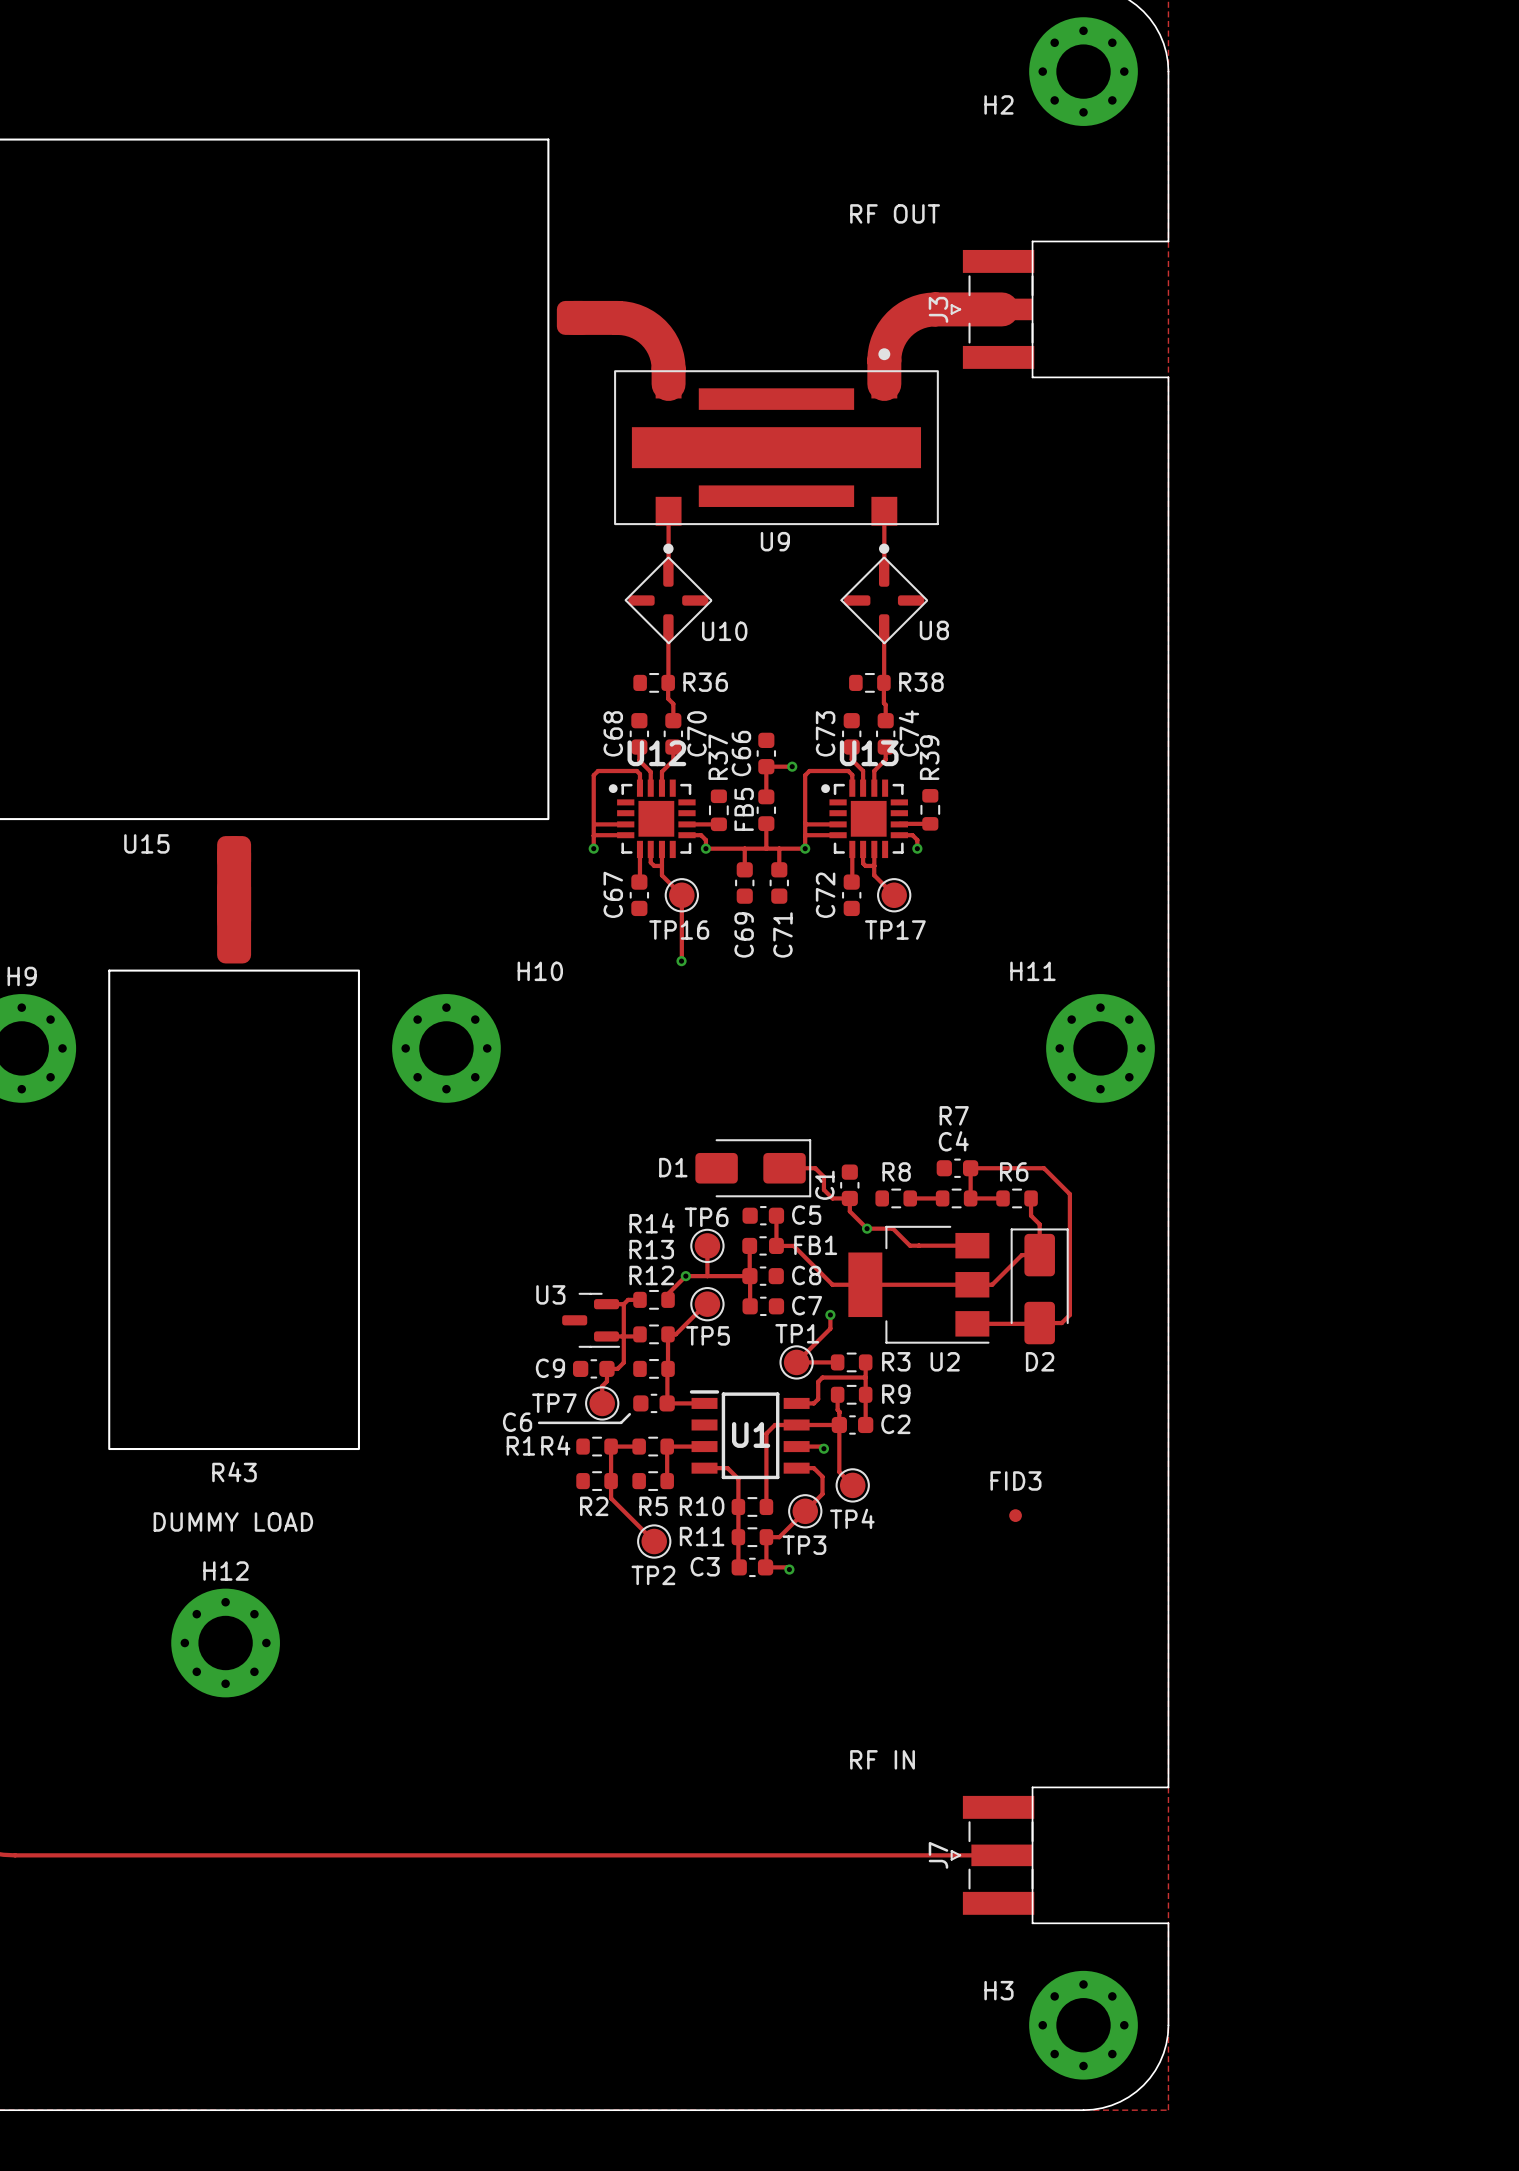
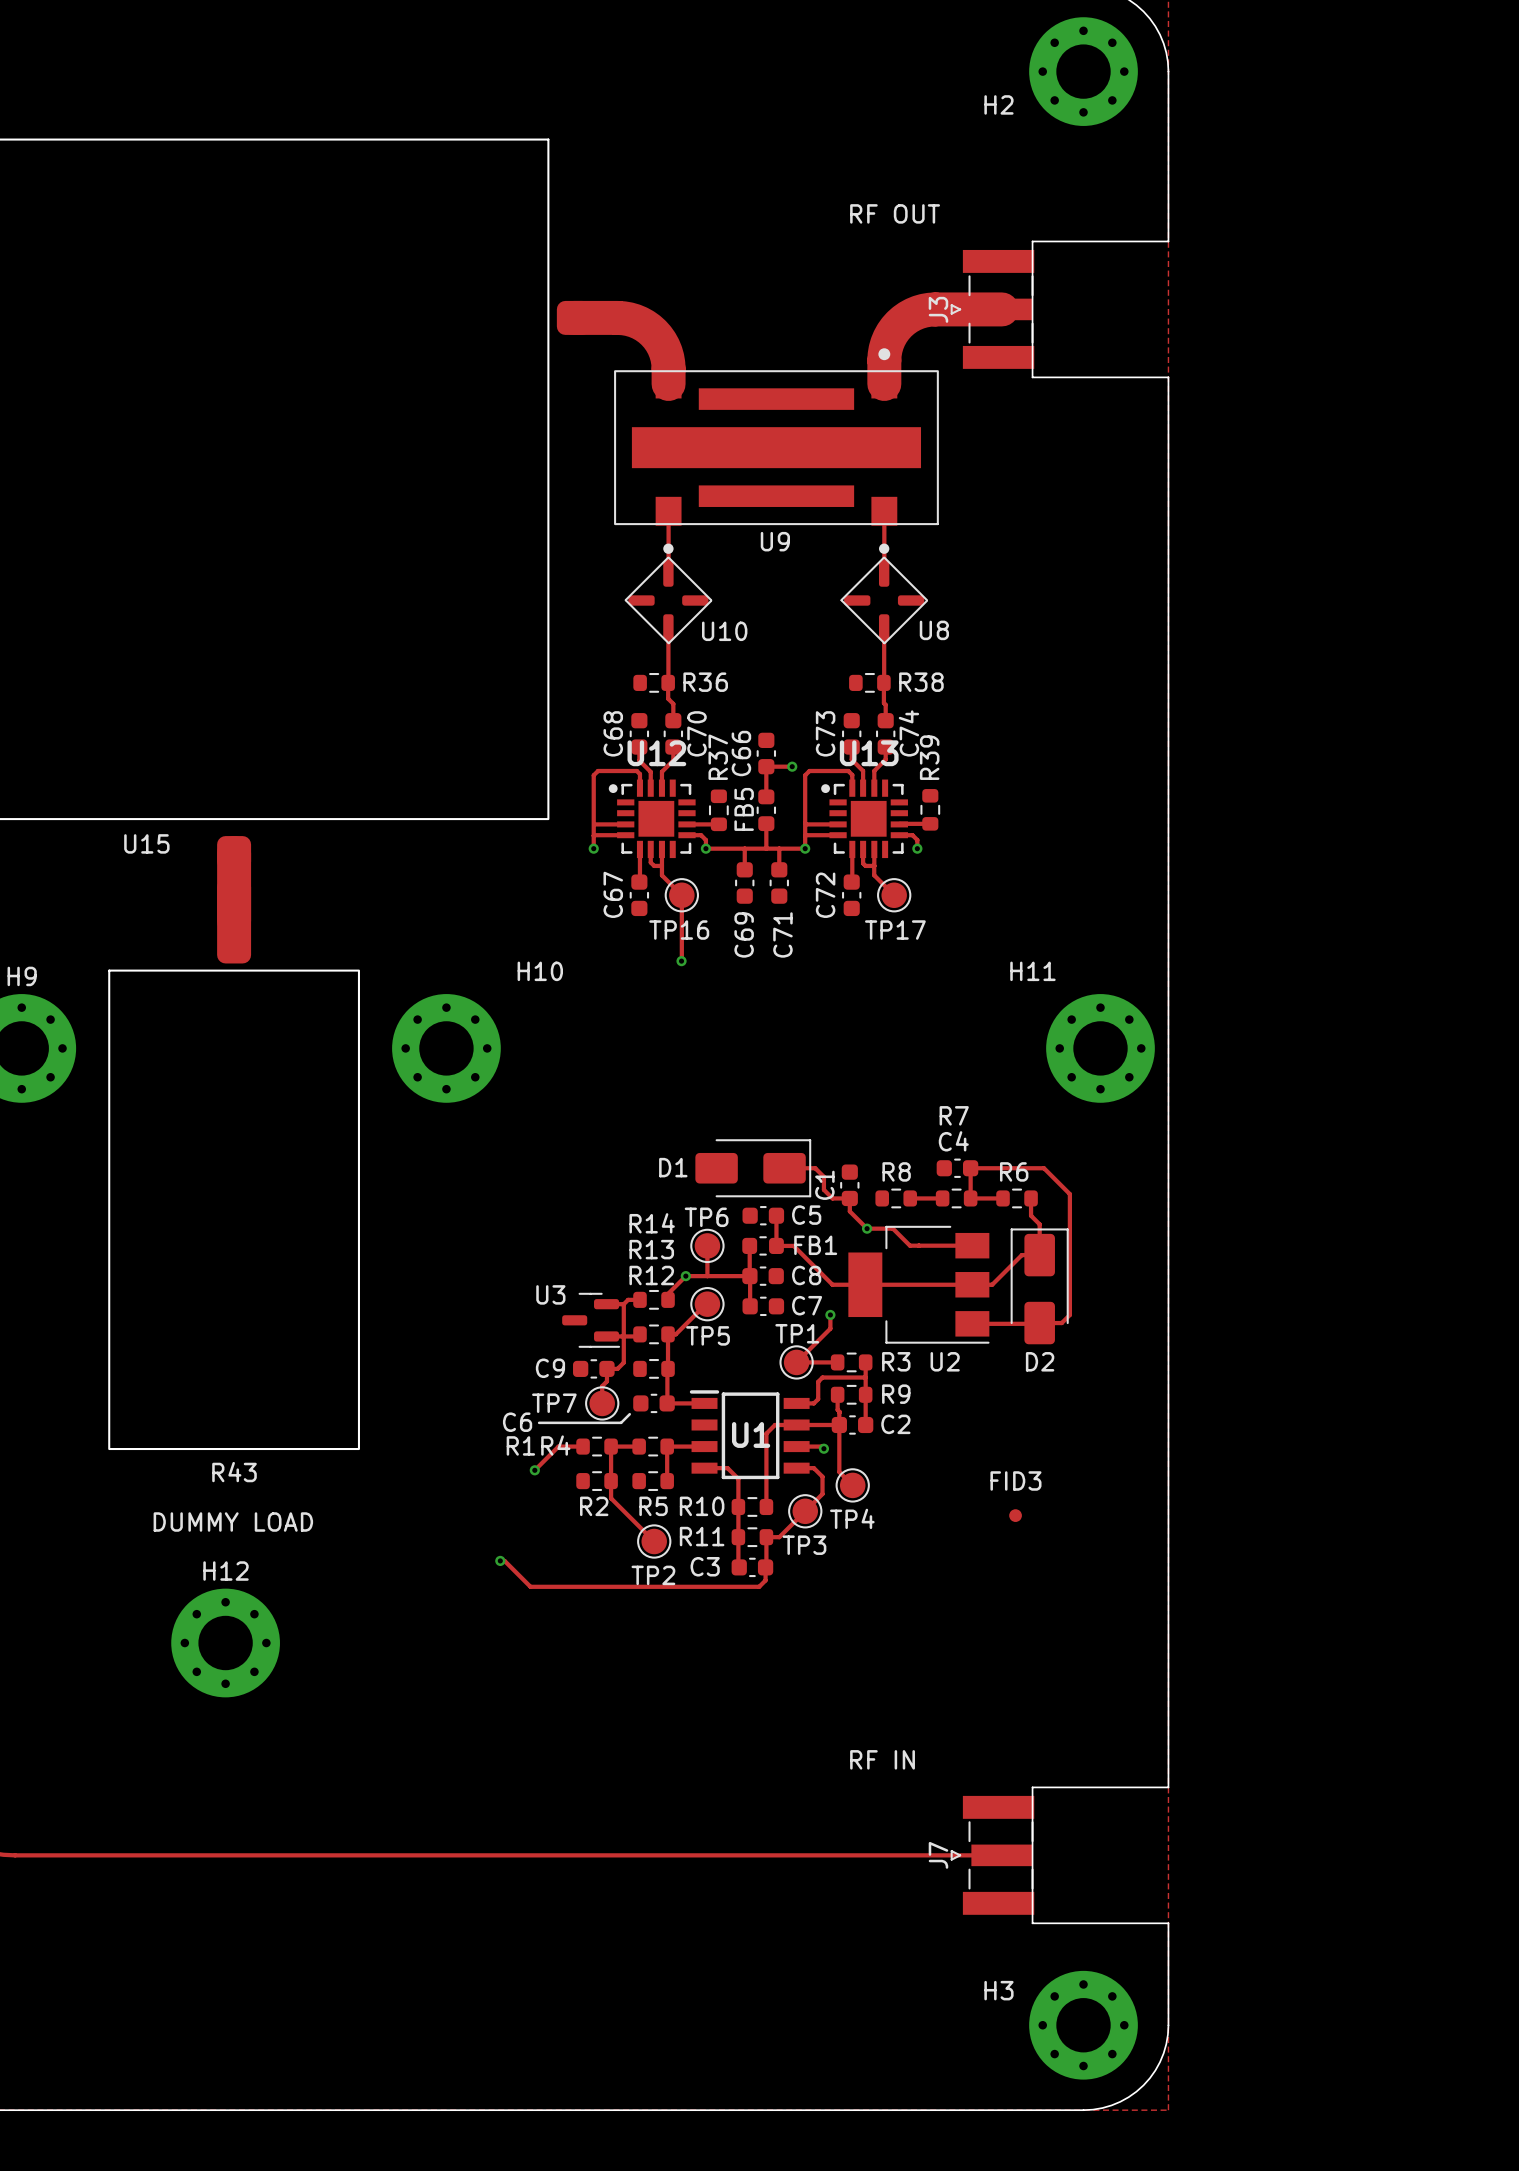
track: none -> (583, 1446) (558, 1446) (534, 1470)
via: none -> (534, 1470)
via: none -> (500, 1560)
track: (765, 1567) (787, 1567) (789, 1569) -> (765, 1567) (765, 1580) (759, 1586) (530, 1586) (504, 1560) (500, 1560)
via: (789, 1569) -> none

